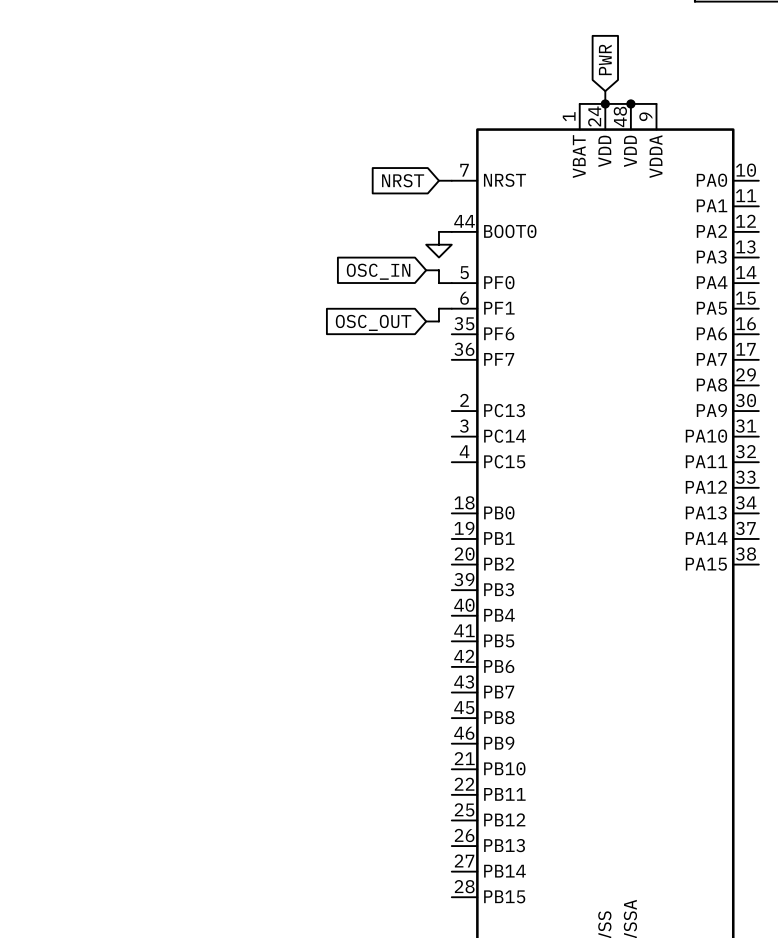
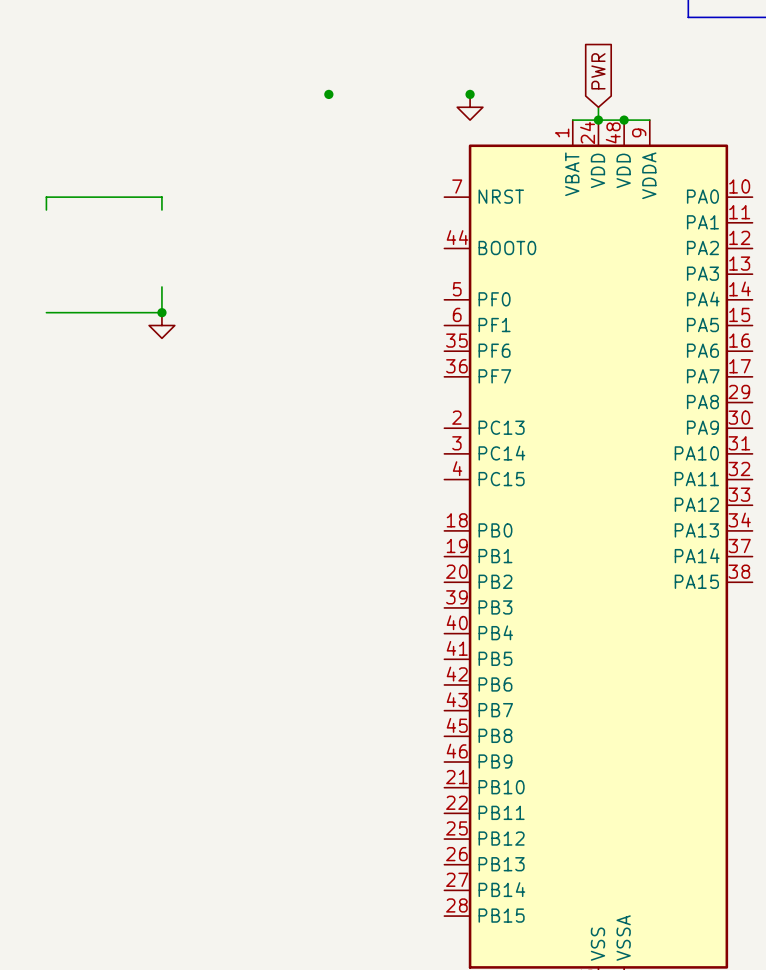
junction: none -> (328, 94)
junction: none -> (470, 94)
power symbol: none -> (470, 107)
global label: NRST (403, 180) -> none
wire: (438, 180) (451, 180) -> none
wire: none -> (46, 209) (46, 197) (161, 197) (161, 209)
wire: (438, 231) (451, 231) -> none
power symbol: (438, 244) -> none
wire: none -> (161, 286) (161, 312) (46, 312)
wire: (426, 270) (438, 270) (438, 283) (451, 283) -> none
global label: OSC_IN (378, 271) -> none
junction: none -> (161, 312)
power symbol: none -> (161, 325)
wire: (451, 308) (438, 308) (438, 321) (426, 321) -> none
global label: OSC_OUT (373, 322) -> none

